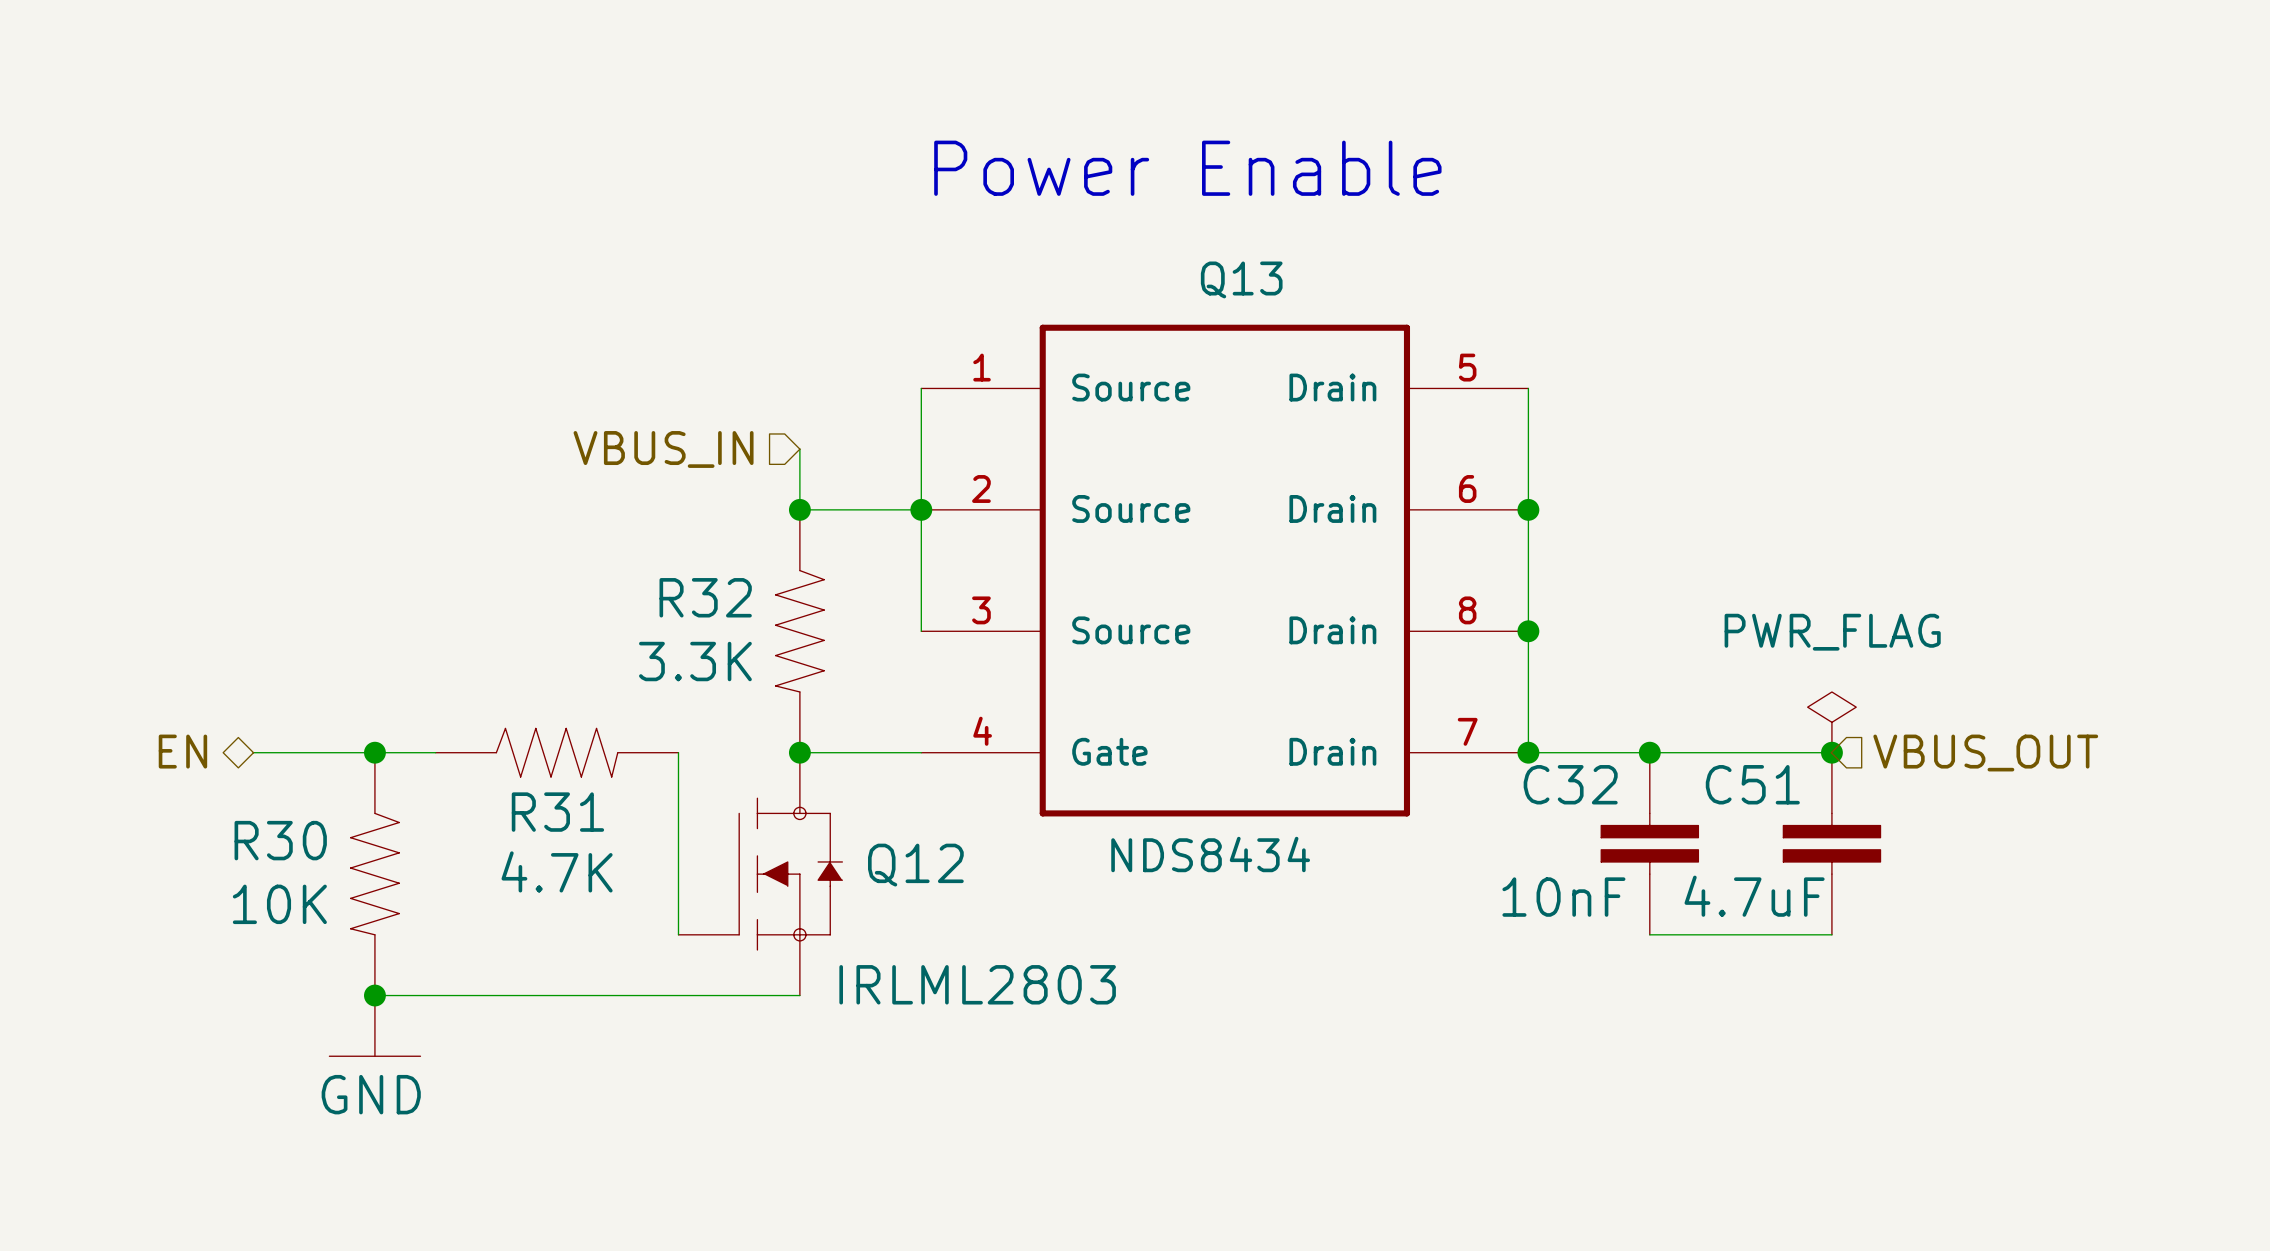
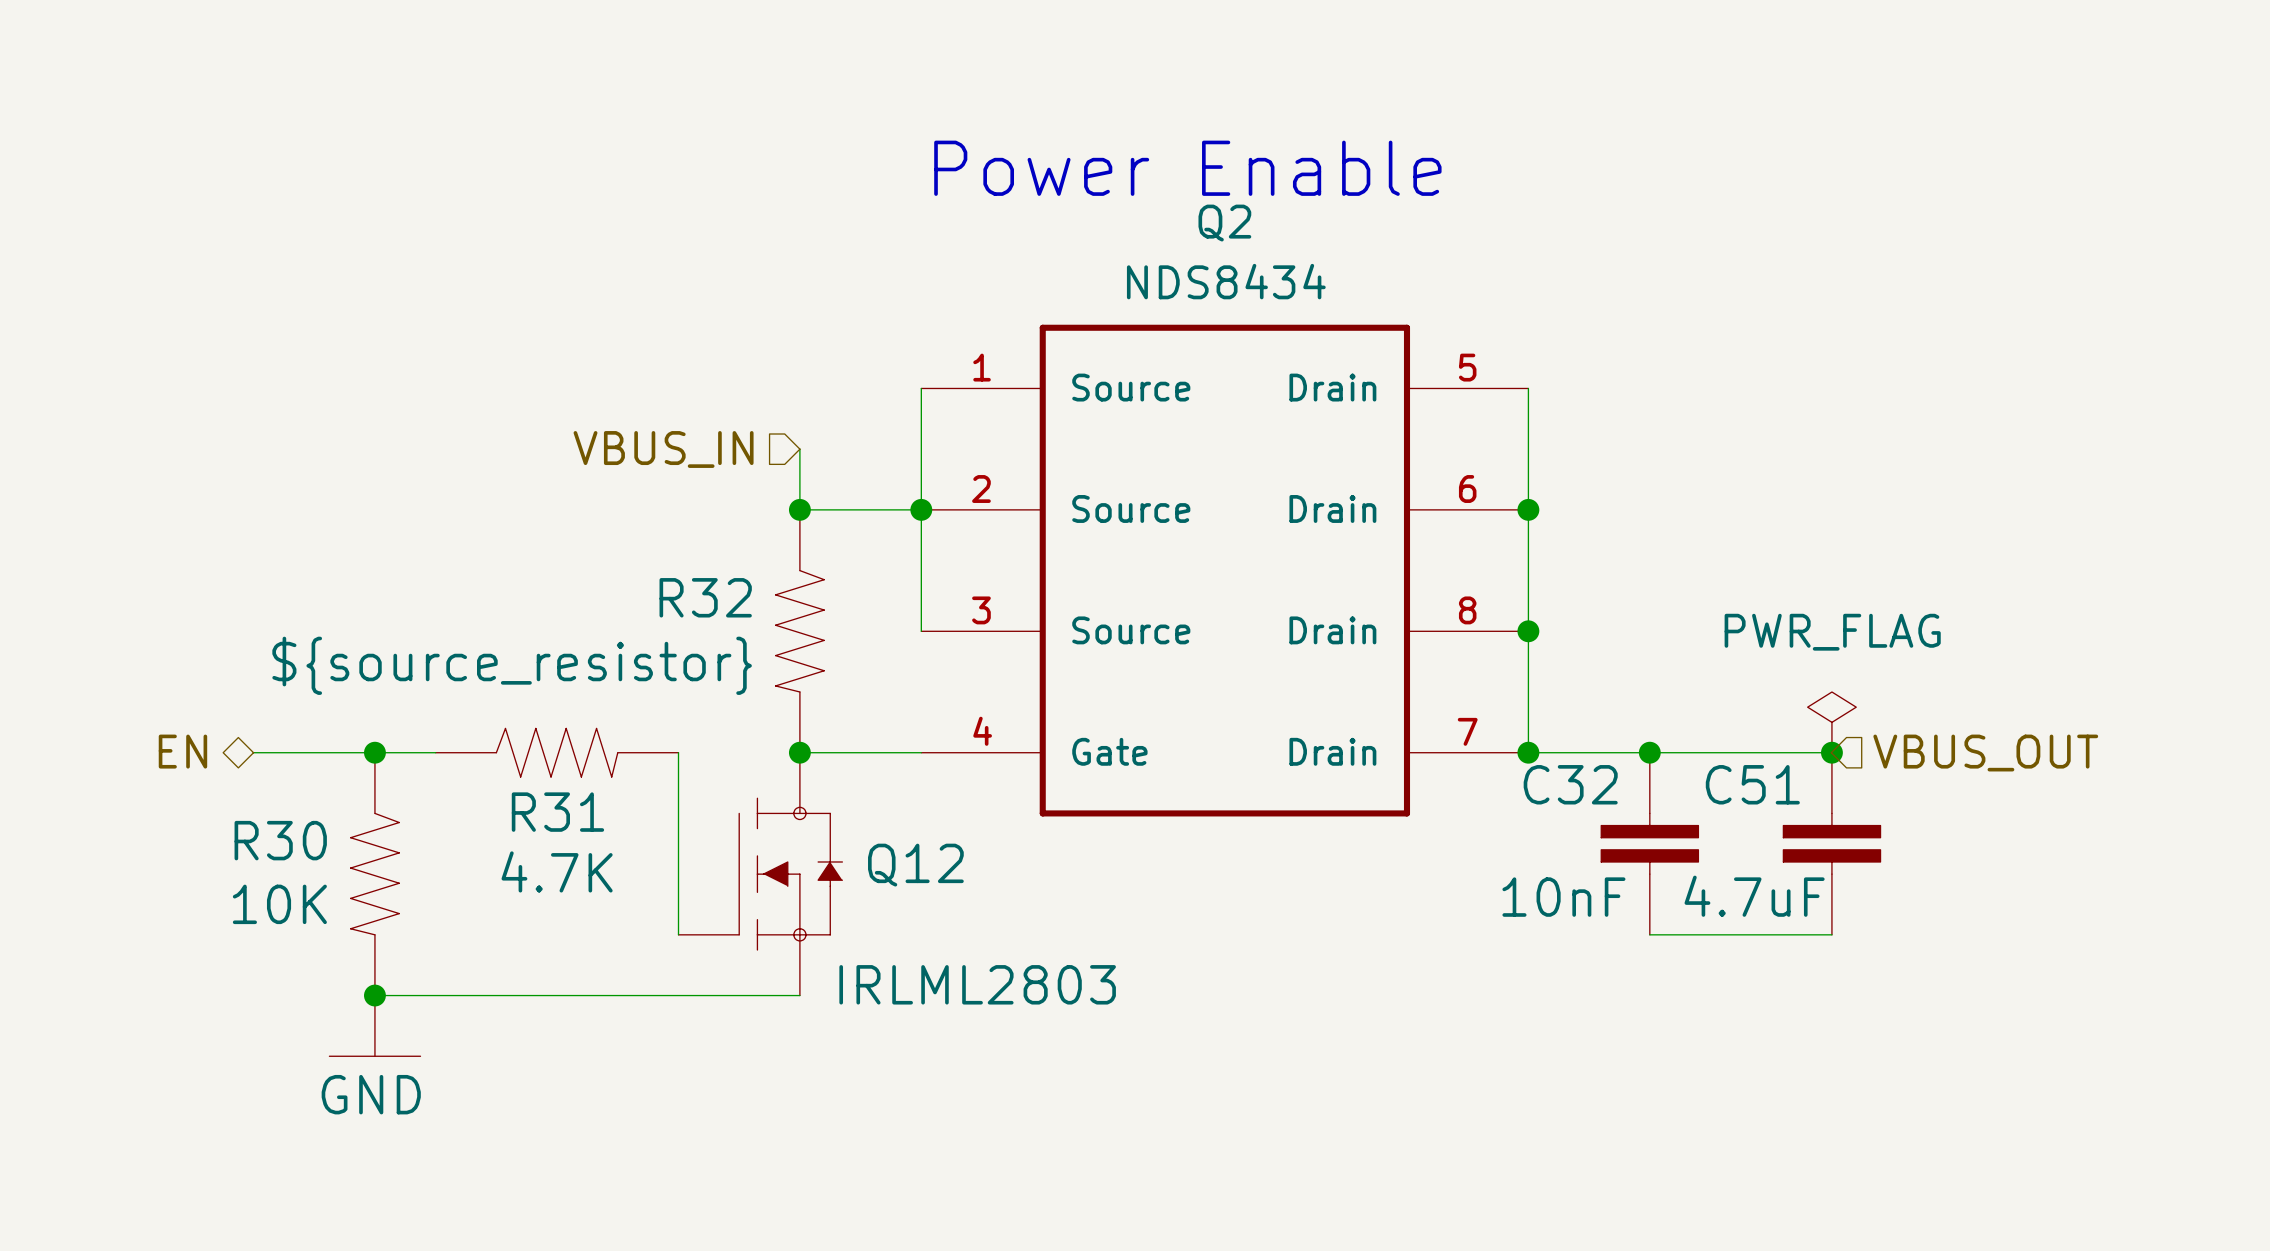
Q13 name: Q13 (1241, 279) -> Q2 (1224, 223)
R32 value: 3.3K (695, 661) -> ${source_resistor} (512, 665)
Q13 value position: NDS8434 (1210, 854) -> NDS8434 (1226, 281)

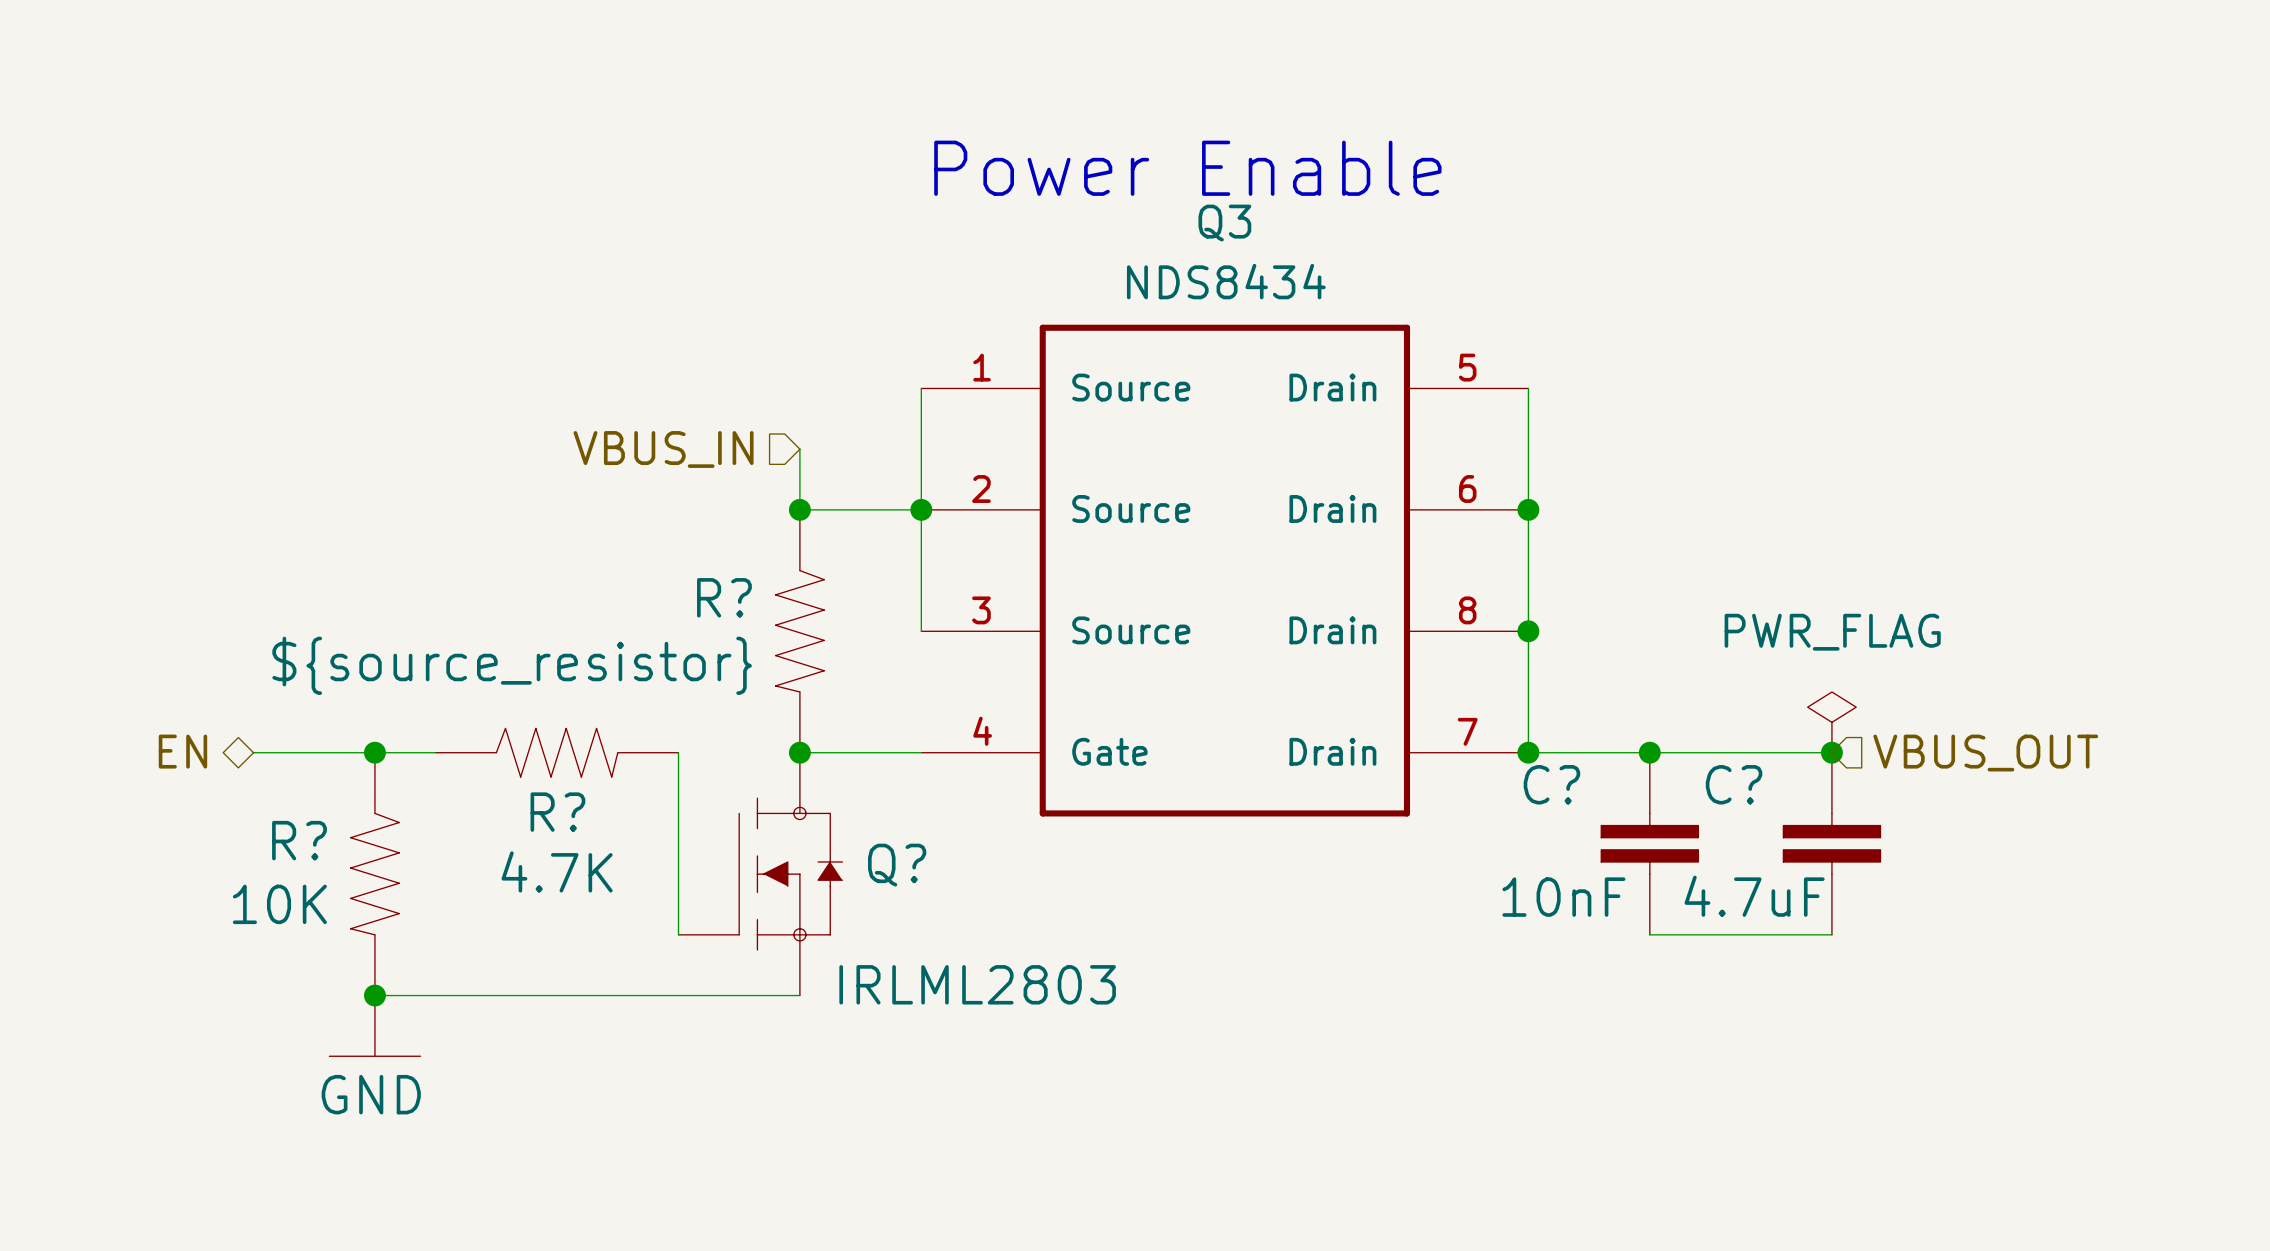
Q2 name: Q2 (1224, 223) -> Q3 (1224, 223)
R32 name: R32 (705, 597) -> R? (724, 597)
C32 name: C32 (1570, 784) -> C? (1551, 784)
C51 name: C51 (1752, 784) -> C? (1734, 784)
R31 name: R31 (557, 812) -> R? (557, 812)
R30 name: R30 (280, 840) -> R? (299, 840)
Q12 name: Q12 (915, 865) -> Q? (897, 865)

